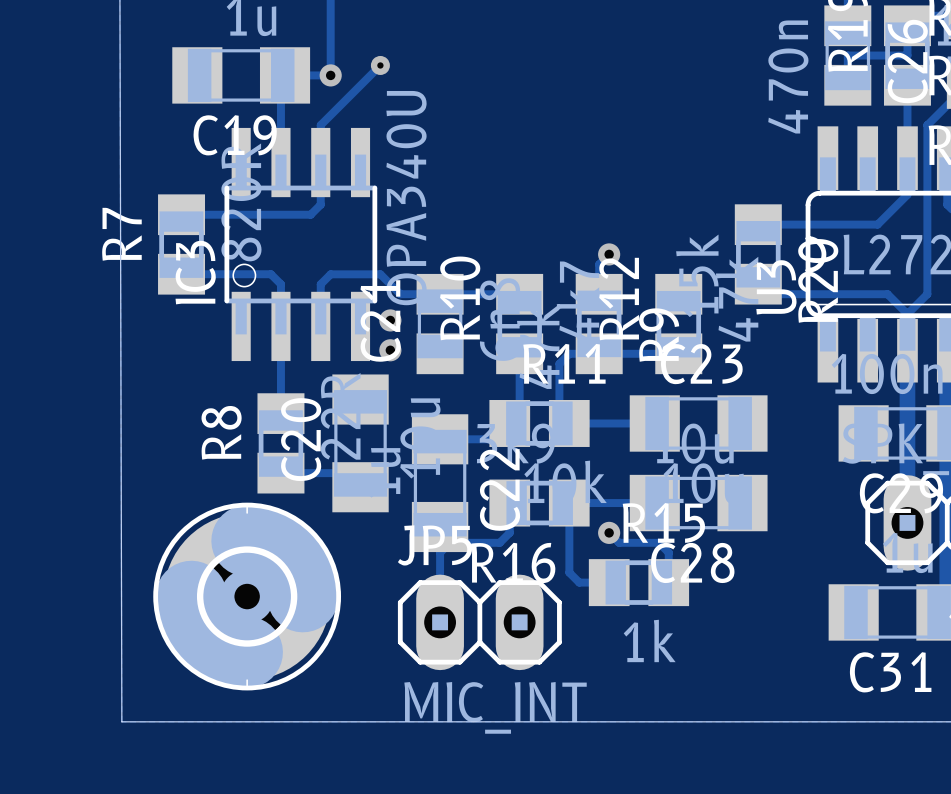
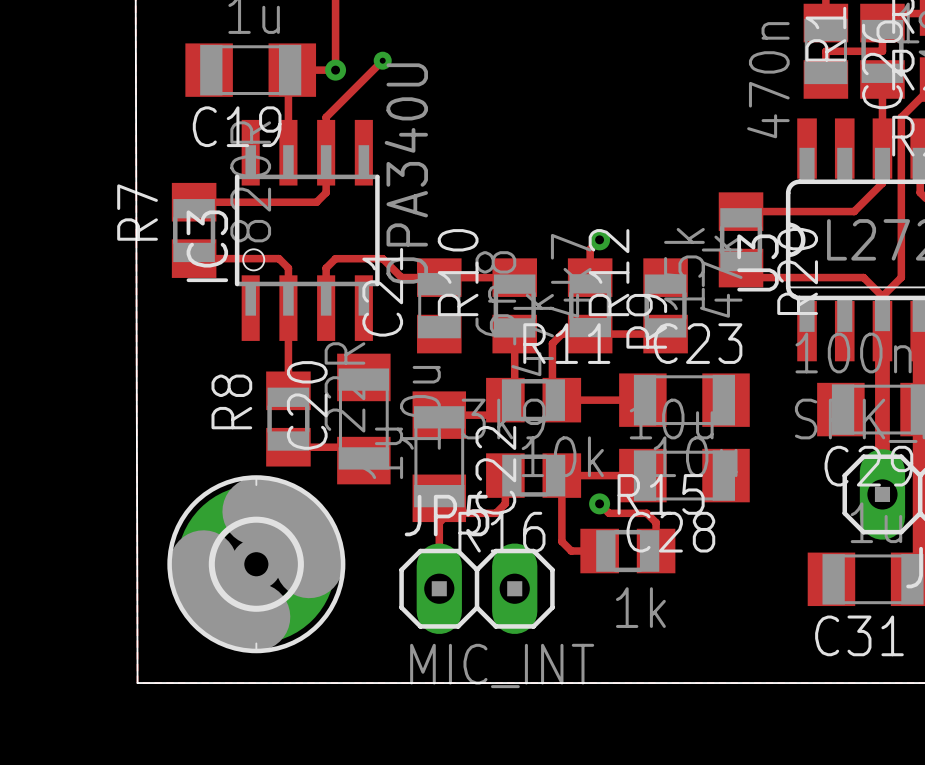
via: (390, 320) -> none
via: (390, 350) -> none

